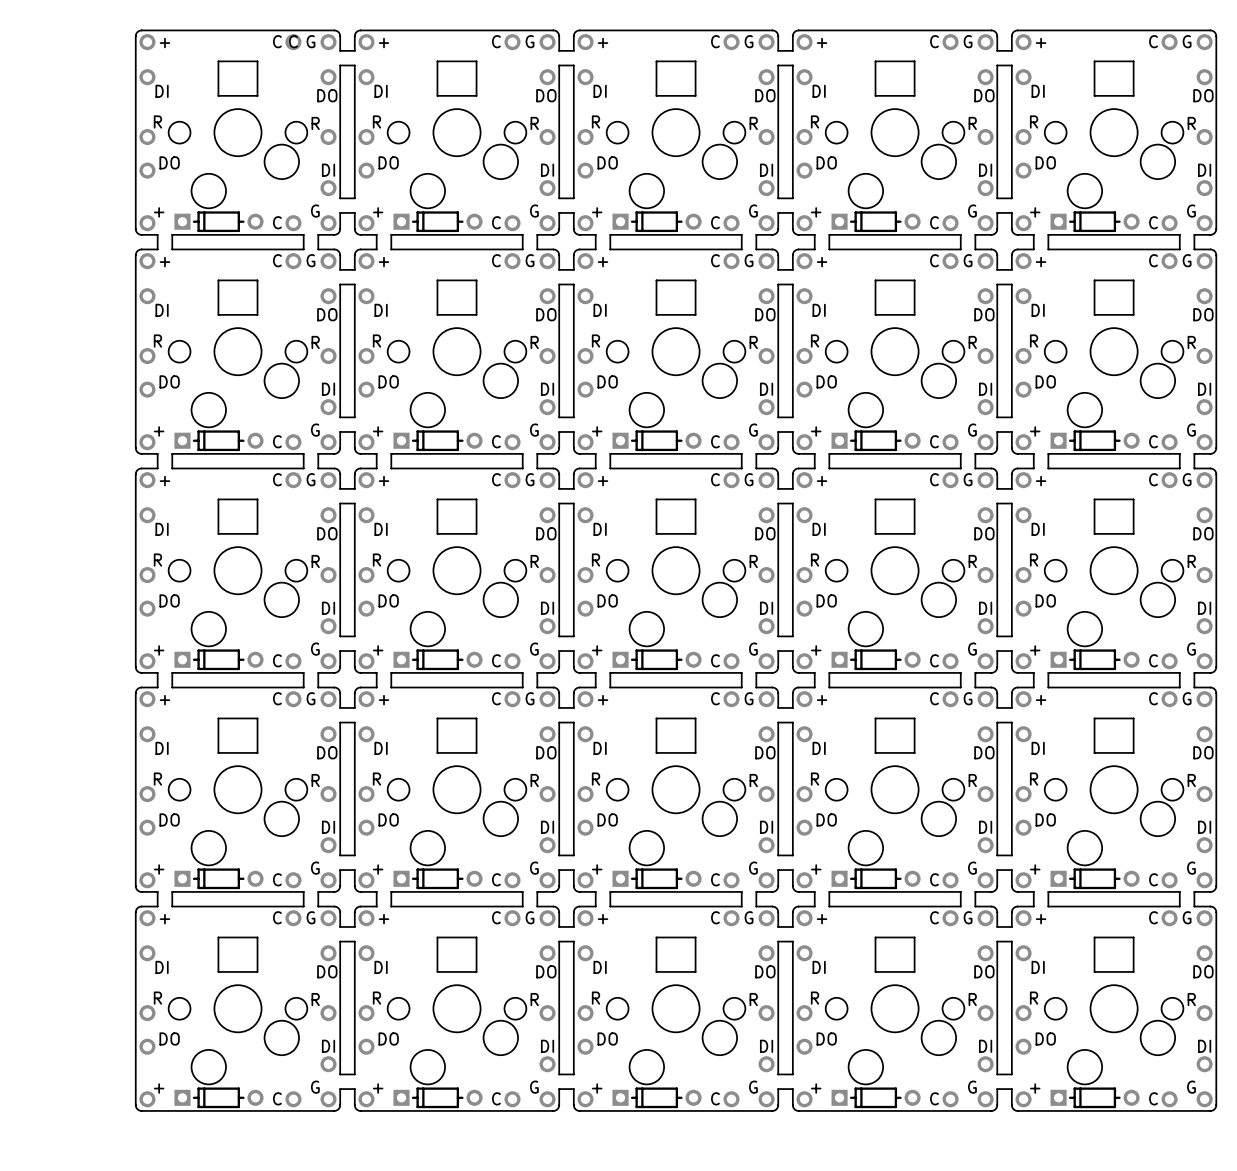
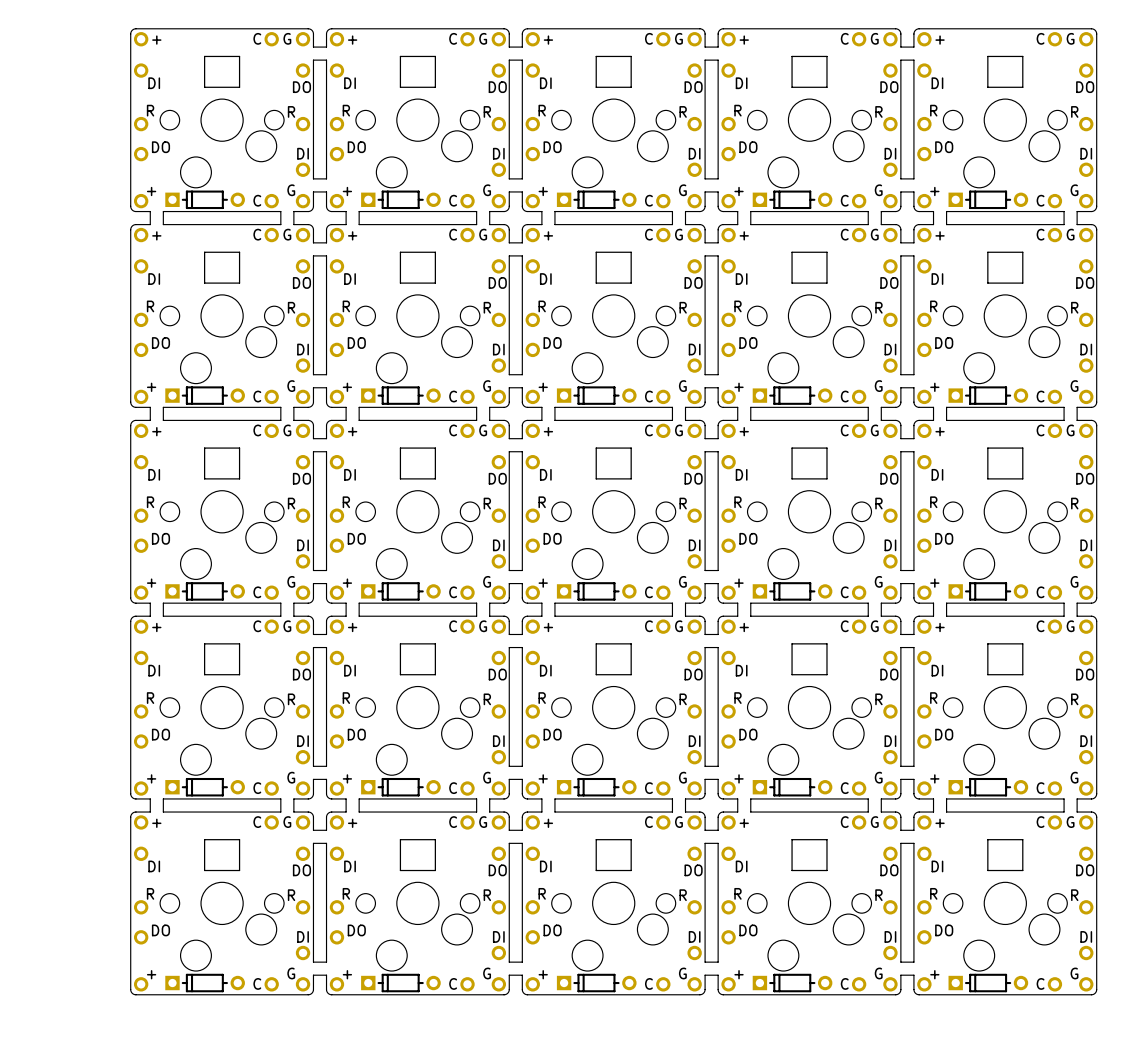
part text: C (293, 41) -> none

